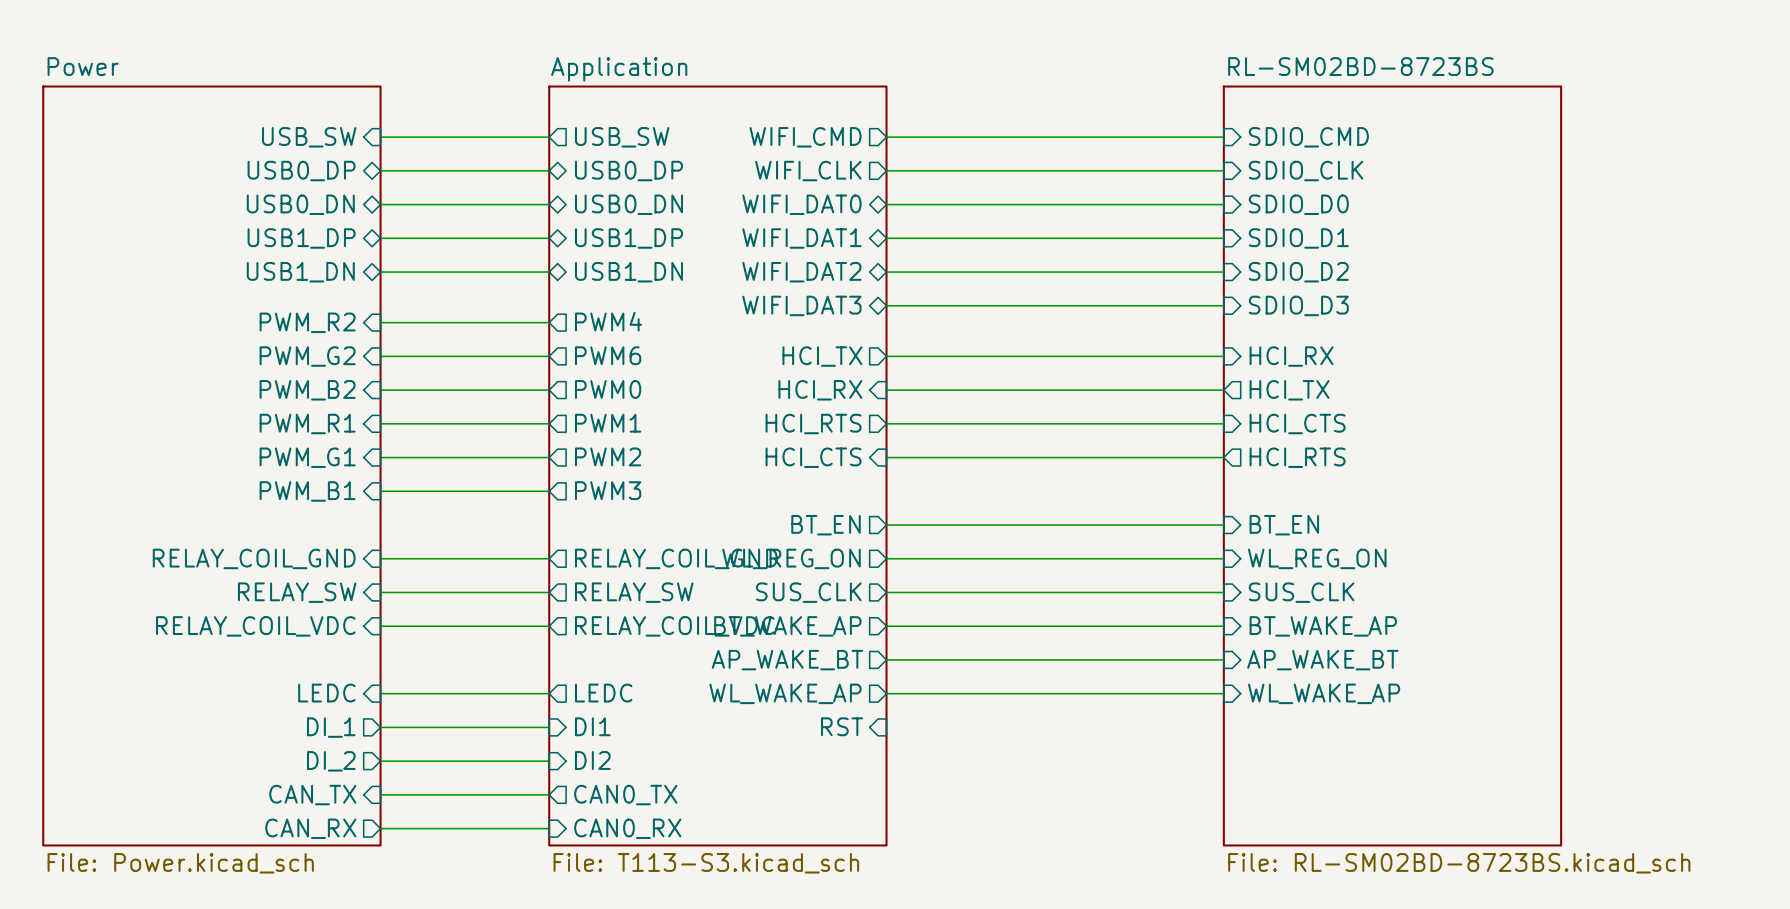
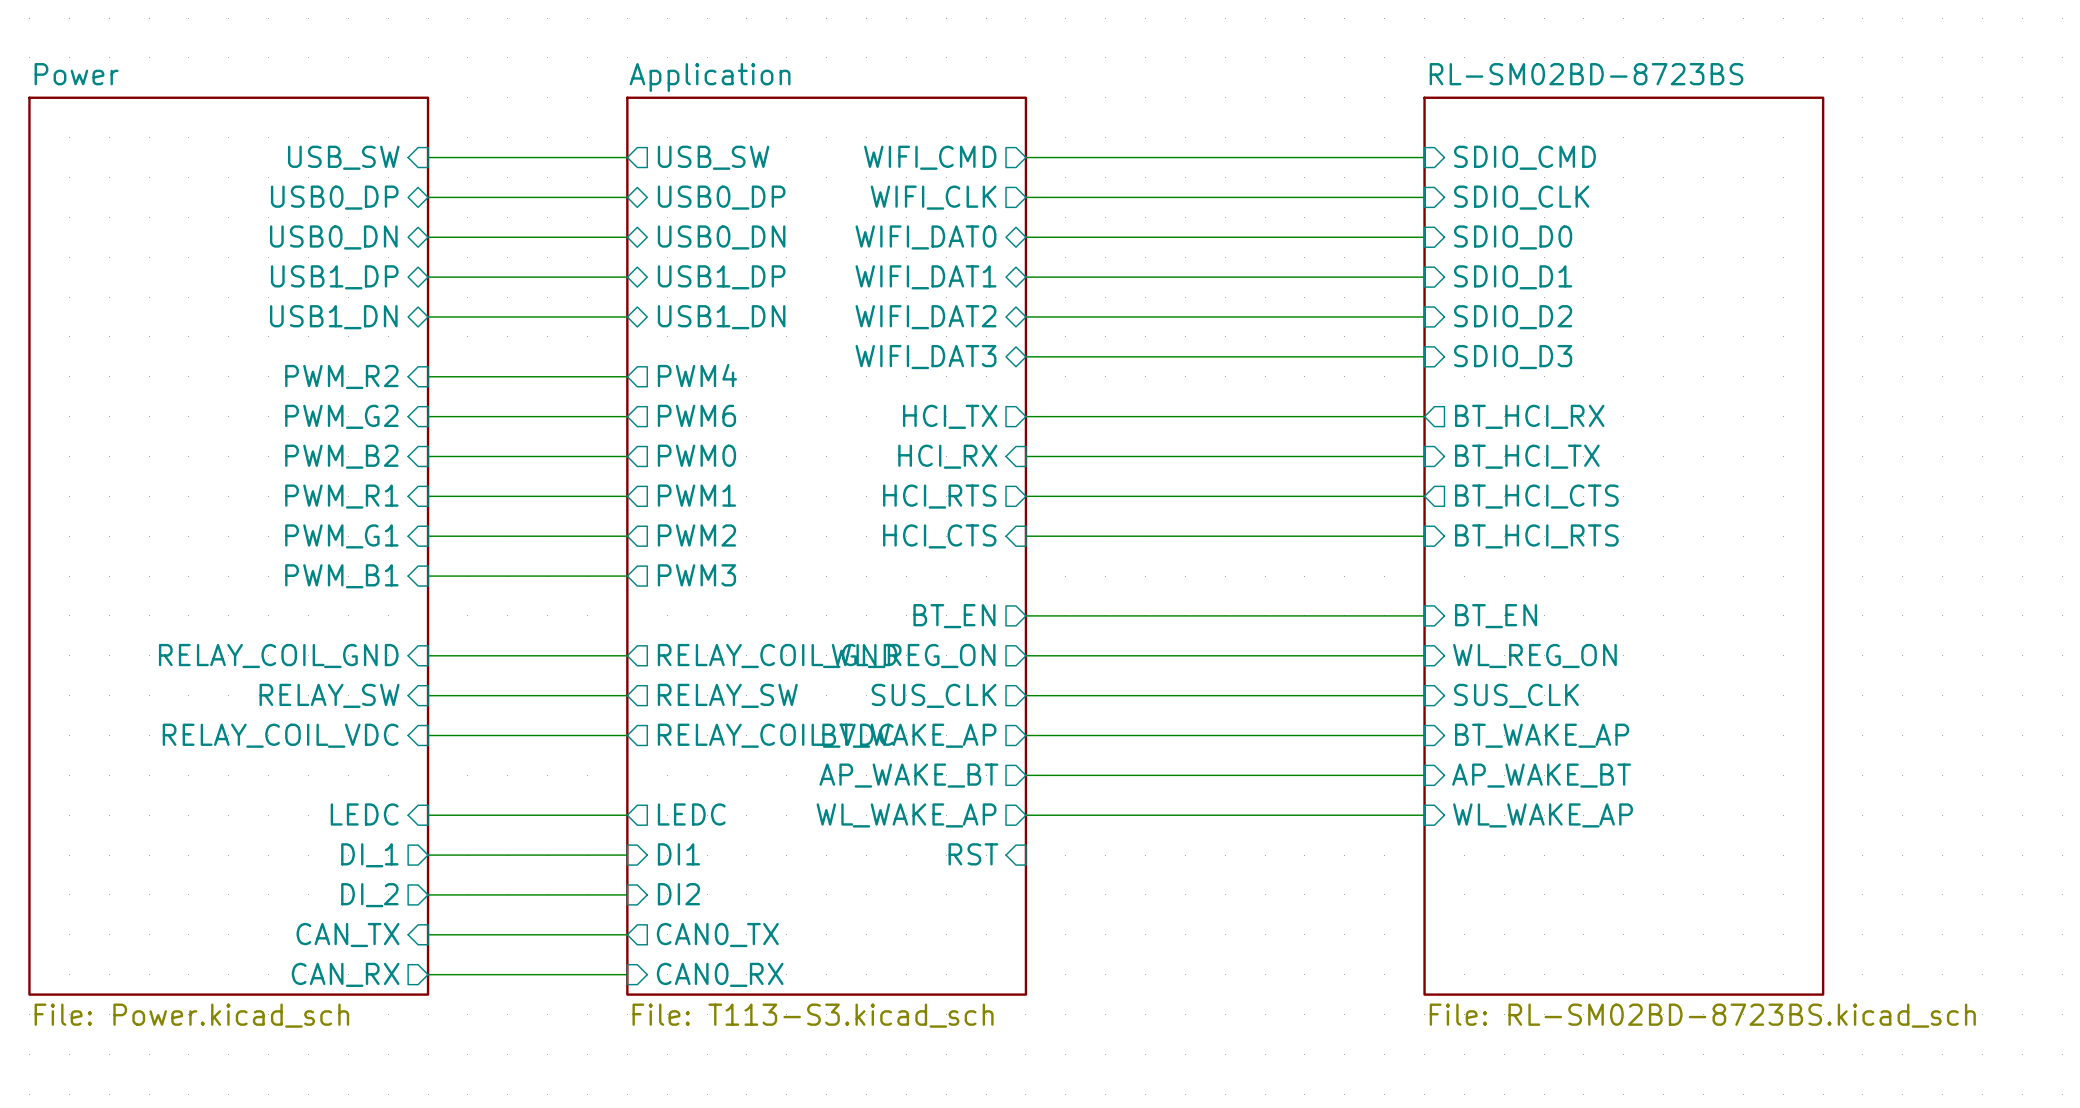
sheet pin shape: input (1291, 356) -> output (1529, 416)
sheet pin: HCI_RX (1291, 356) -> BT_HCI_RX (1529, 416)
sheet pin shape: output (1289, 390) -> input (1527, 456)
sheet pin: HCI_TX (1289, 390) -> BT_HCI_TX (1527, 456)
sheet pin shape: input (1297, 424) -> output (1536, 496)
sheet pin: HCI_CTS (1297, 424) -> BT_HCI_CTS (1536, 496)
sheet pin shape: output (1297, 457) -> input (1536, 536)
sheet pin: HCI_RTS (1297, 457) -> BT_HCI_RTS (1536, 536)

